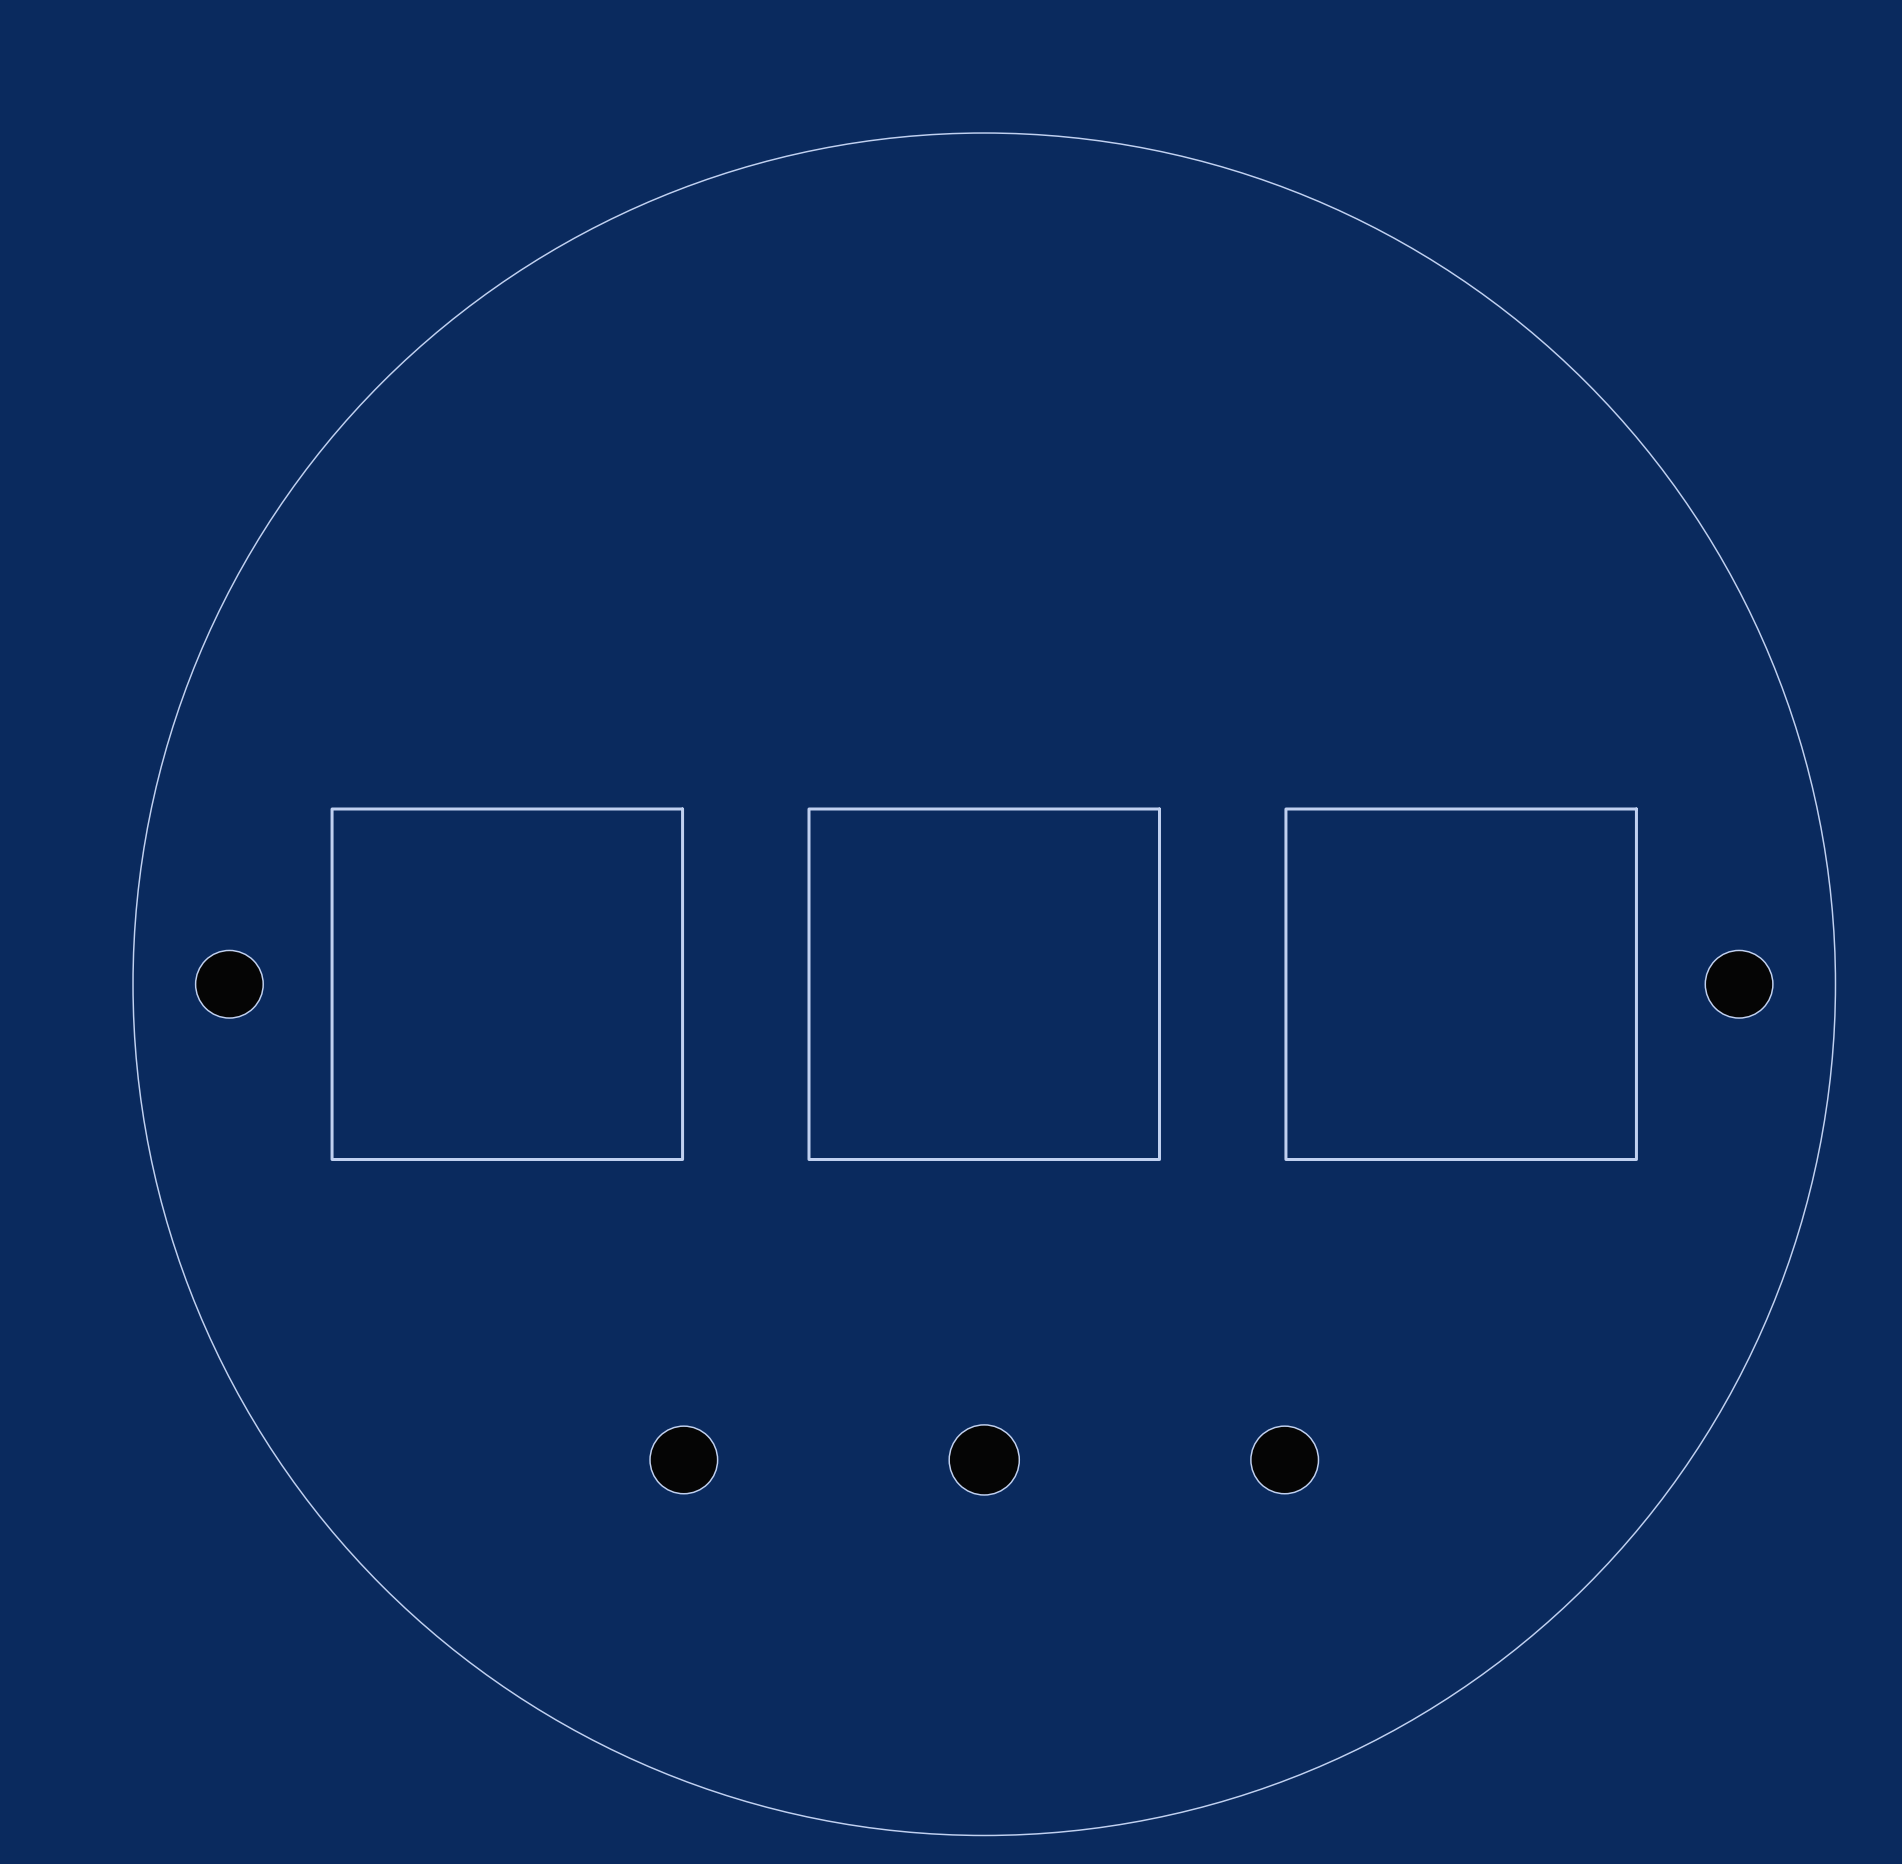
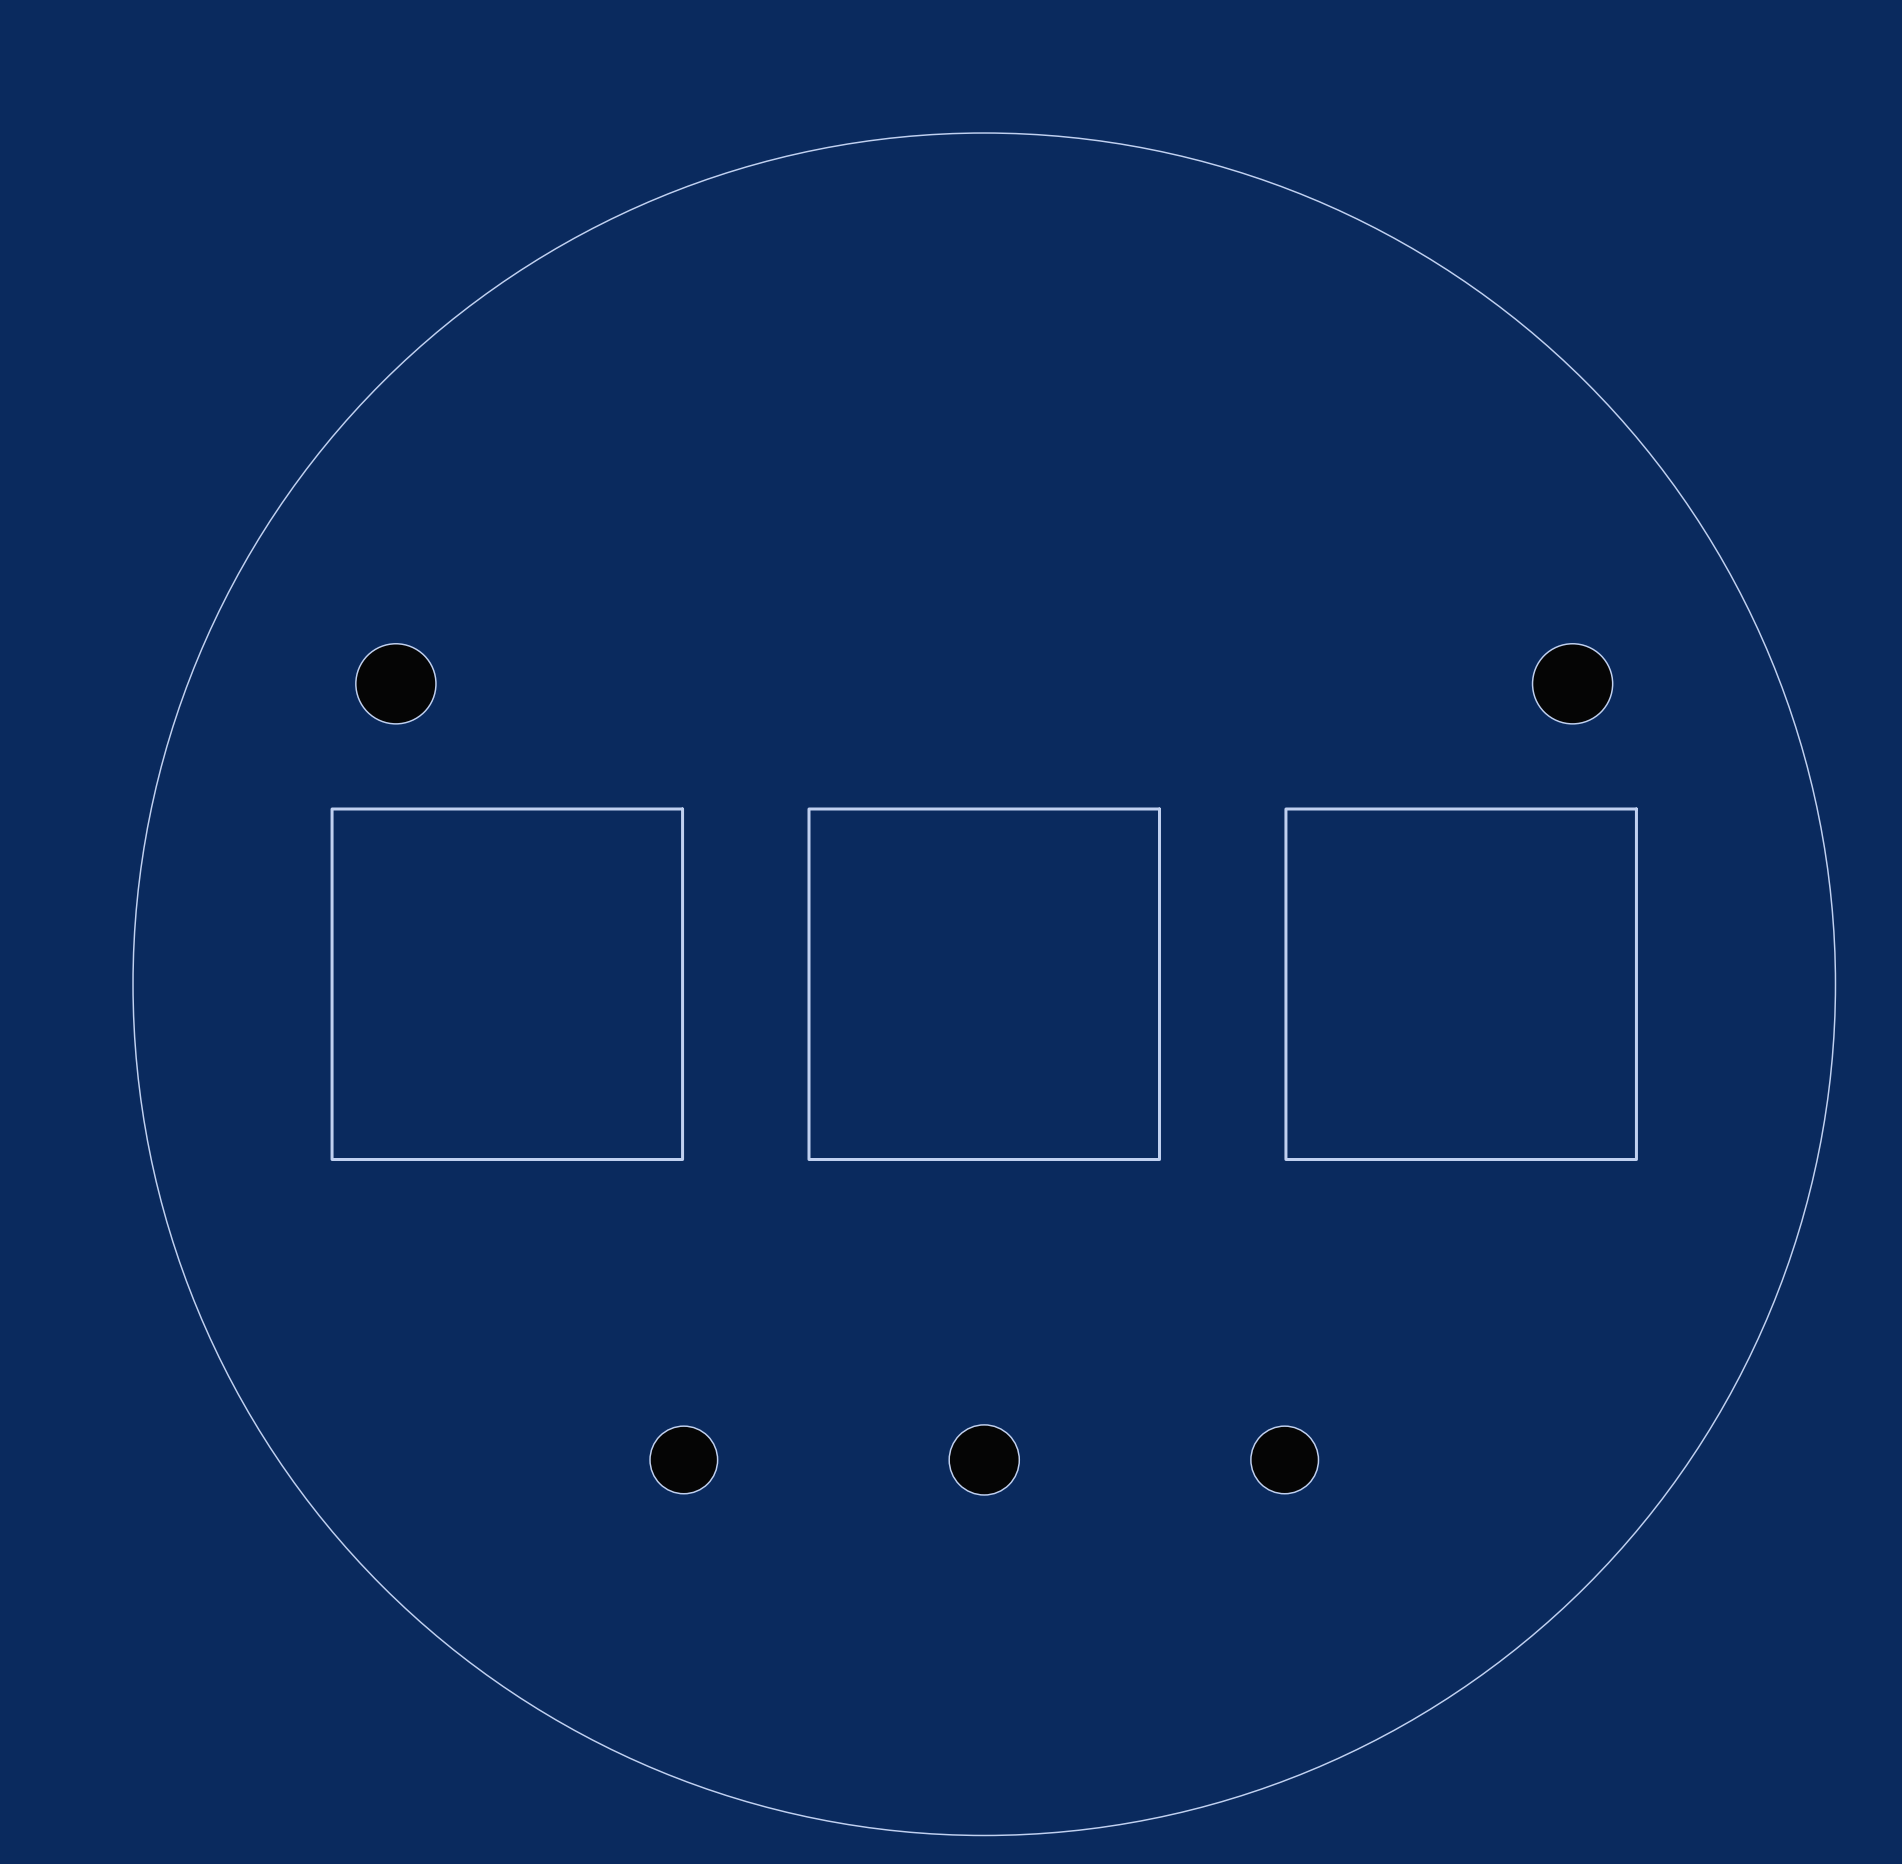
part: none -> (395, 683)
part: none -> (1572, 683)
part: (229, 984) -> none
part: (1739, 984) -> none

